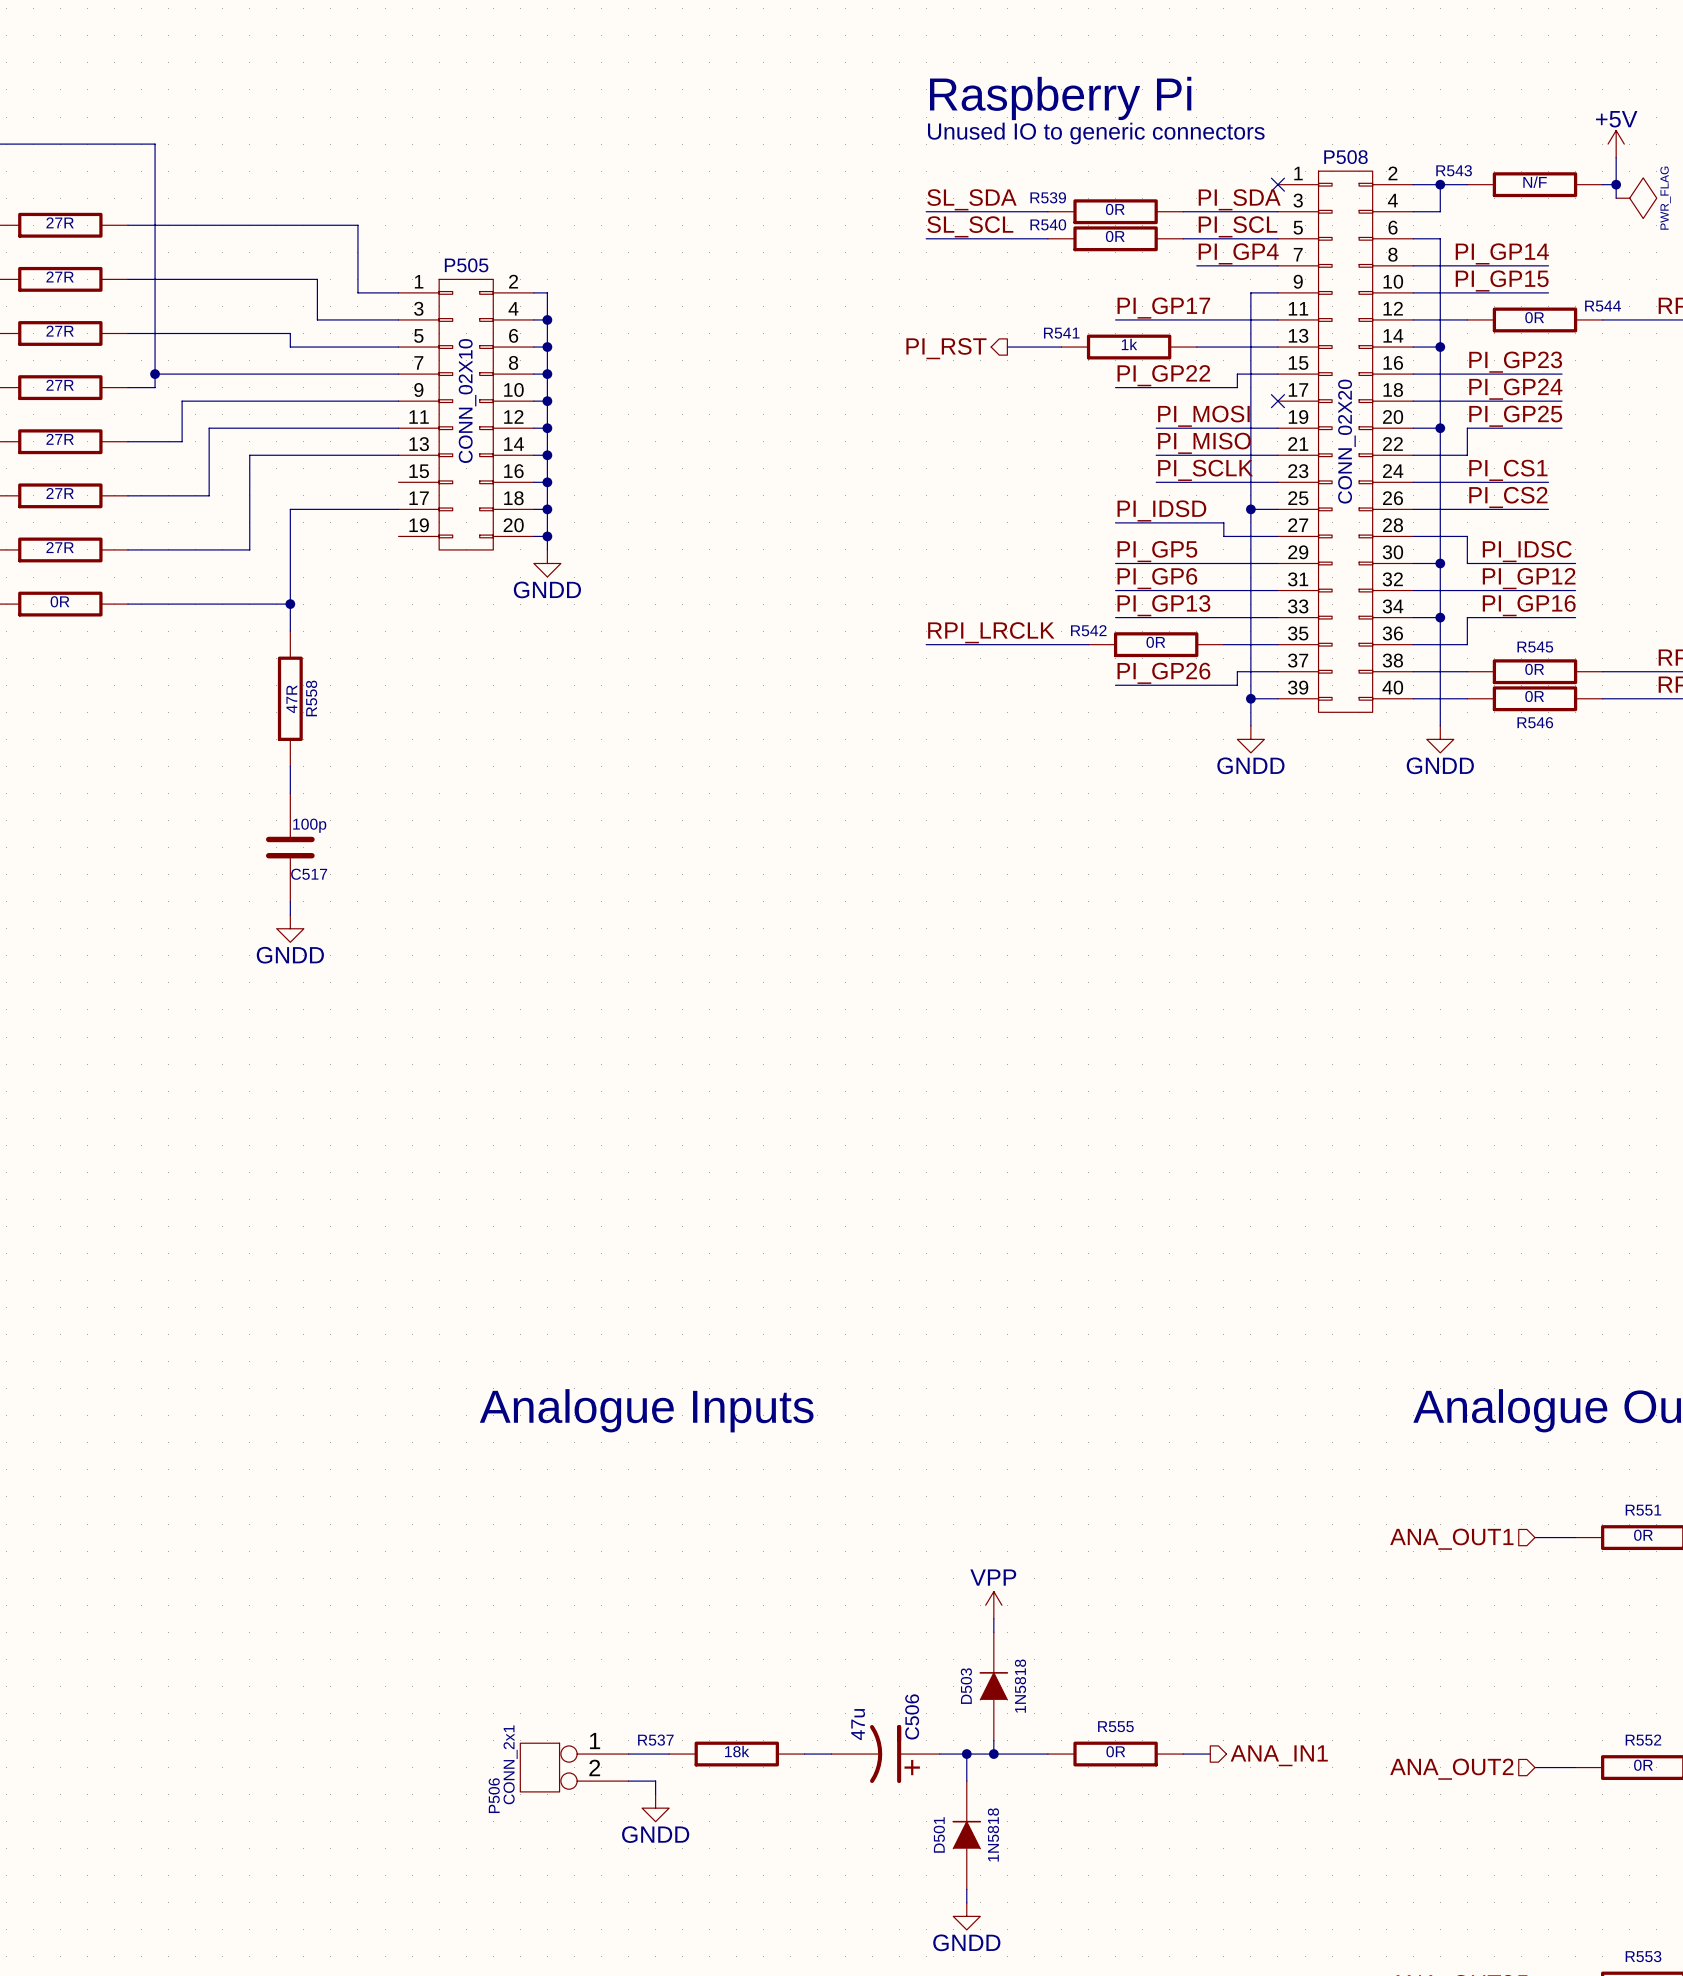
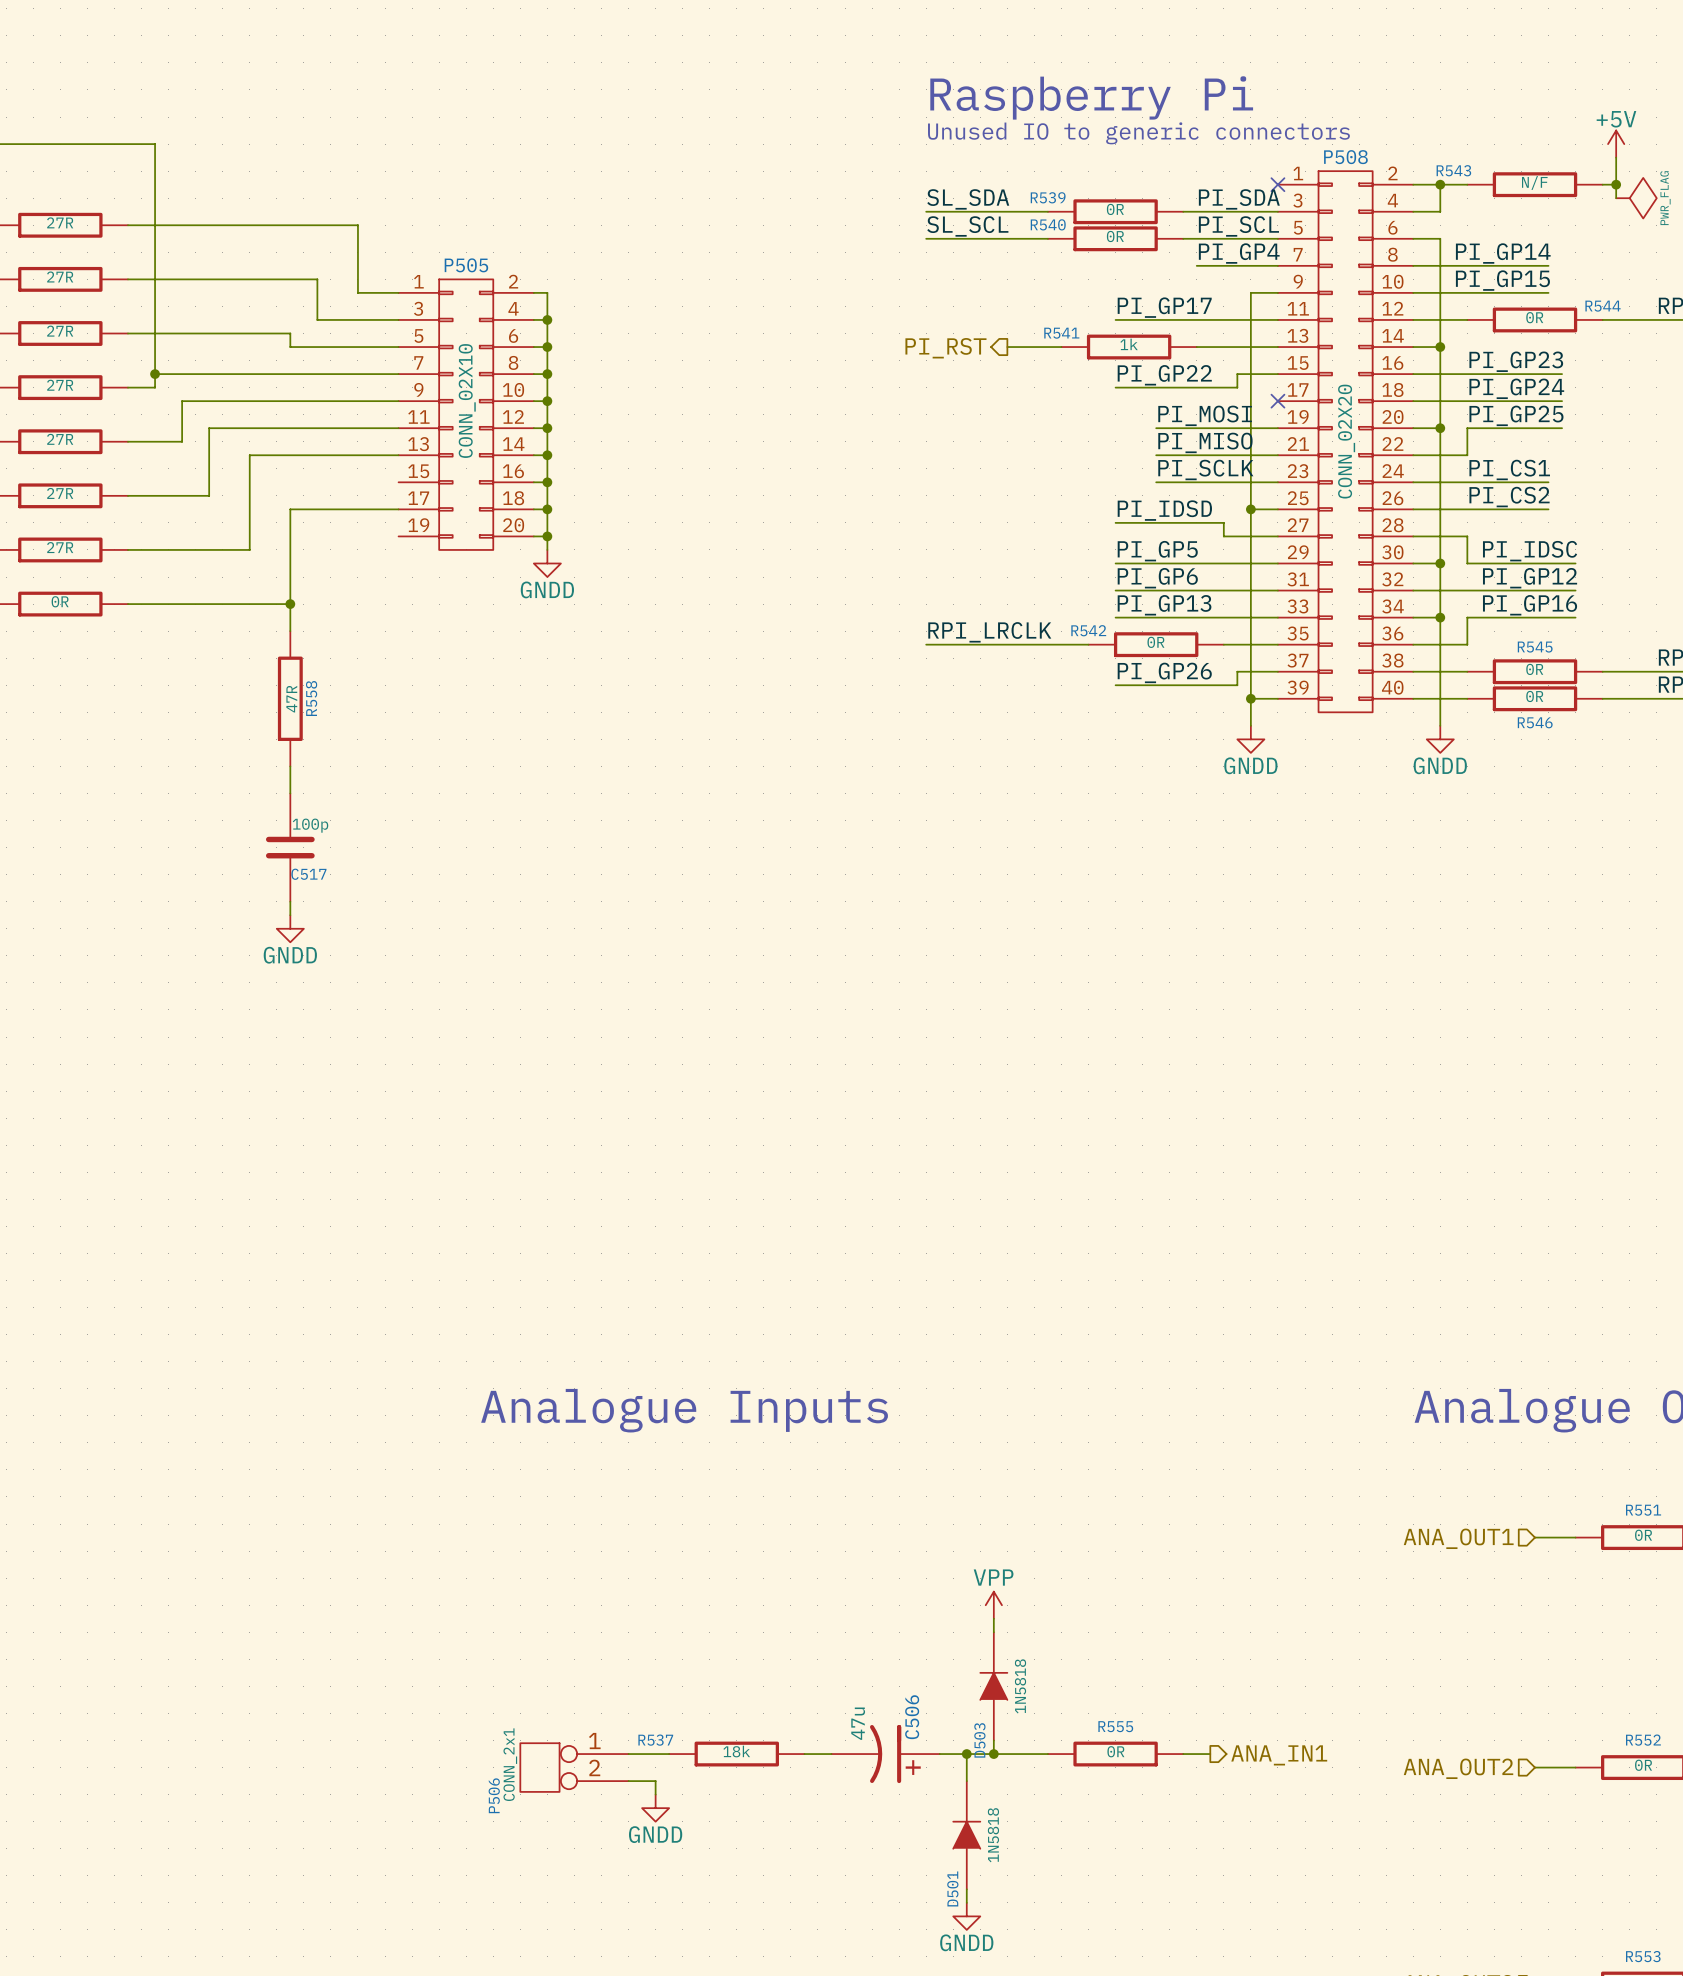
D503 name position: D503 (966, 1686) -> D503 (979, 1740)
D501 name position: D501 (939, 1834) -> D501 (952, 1888)

